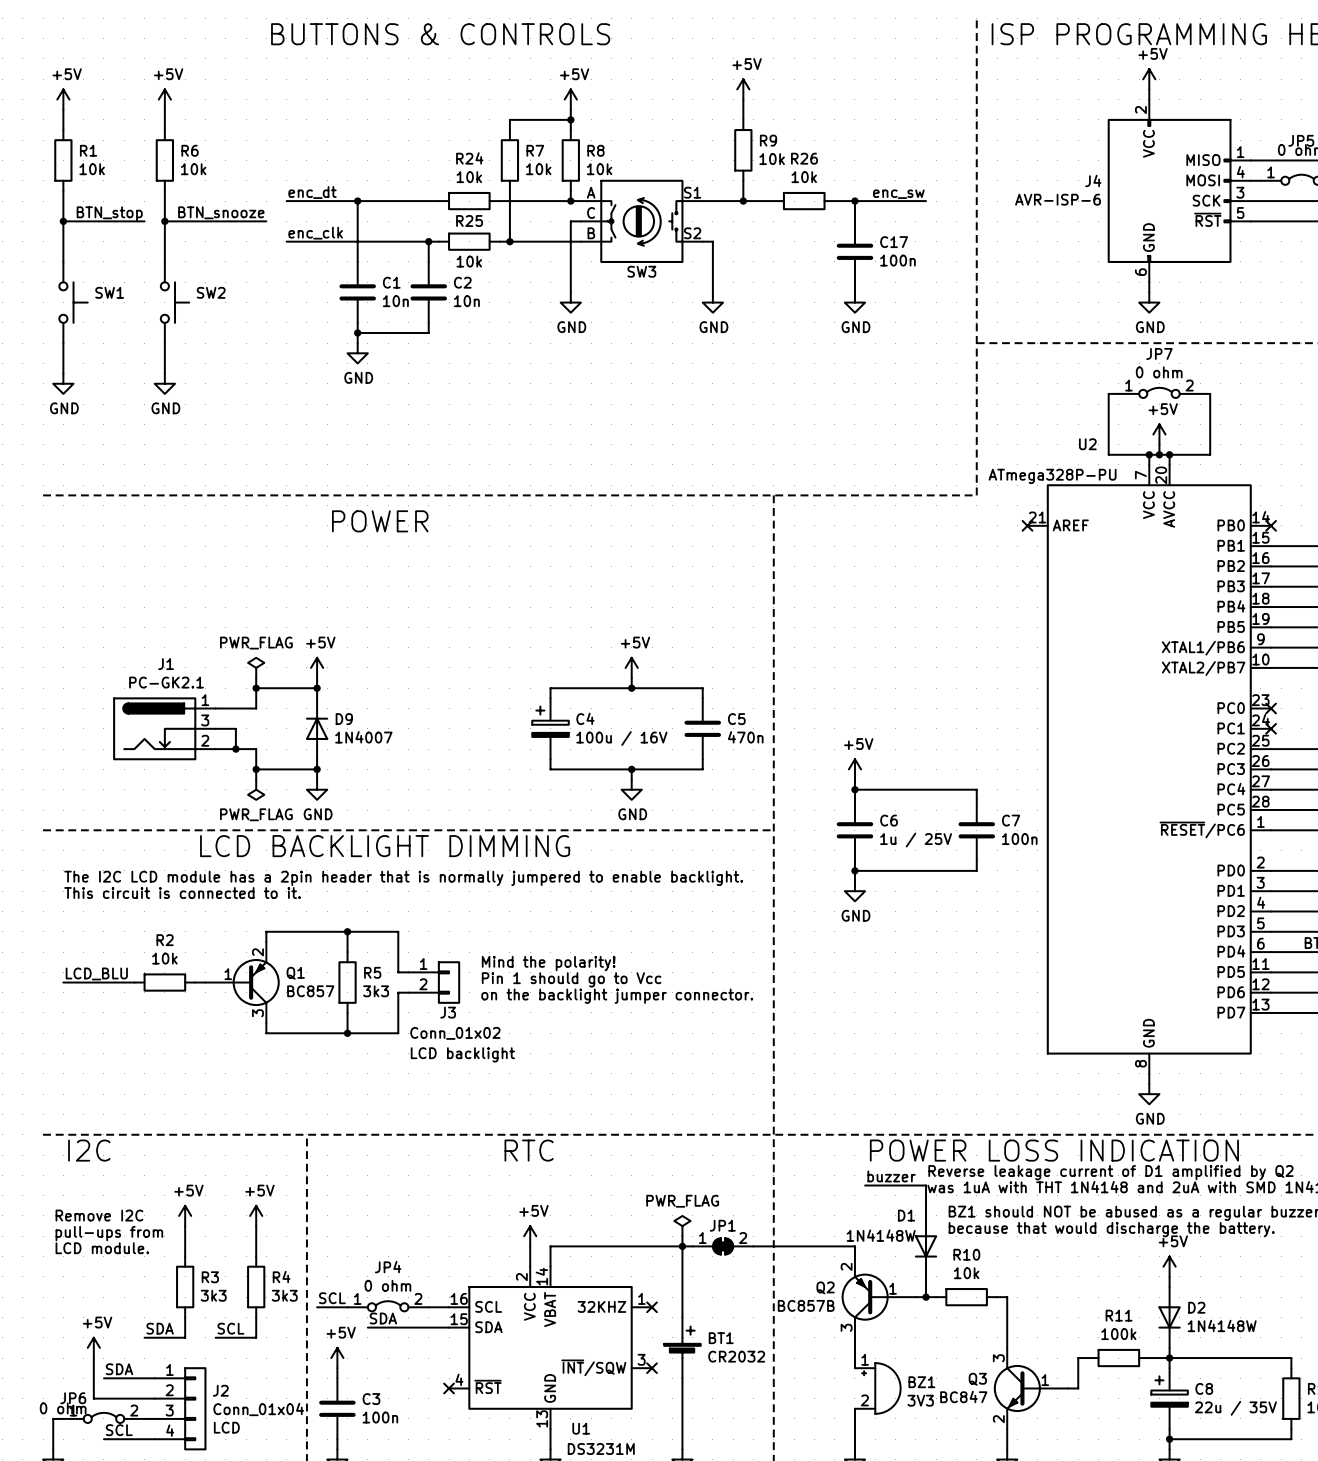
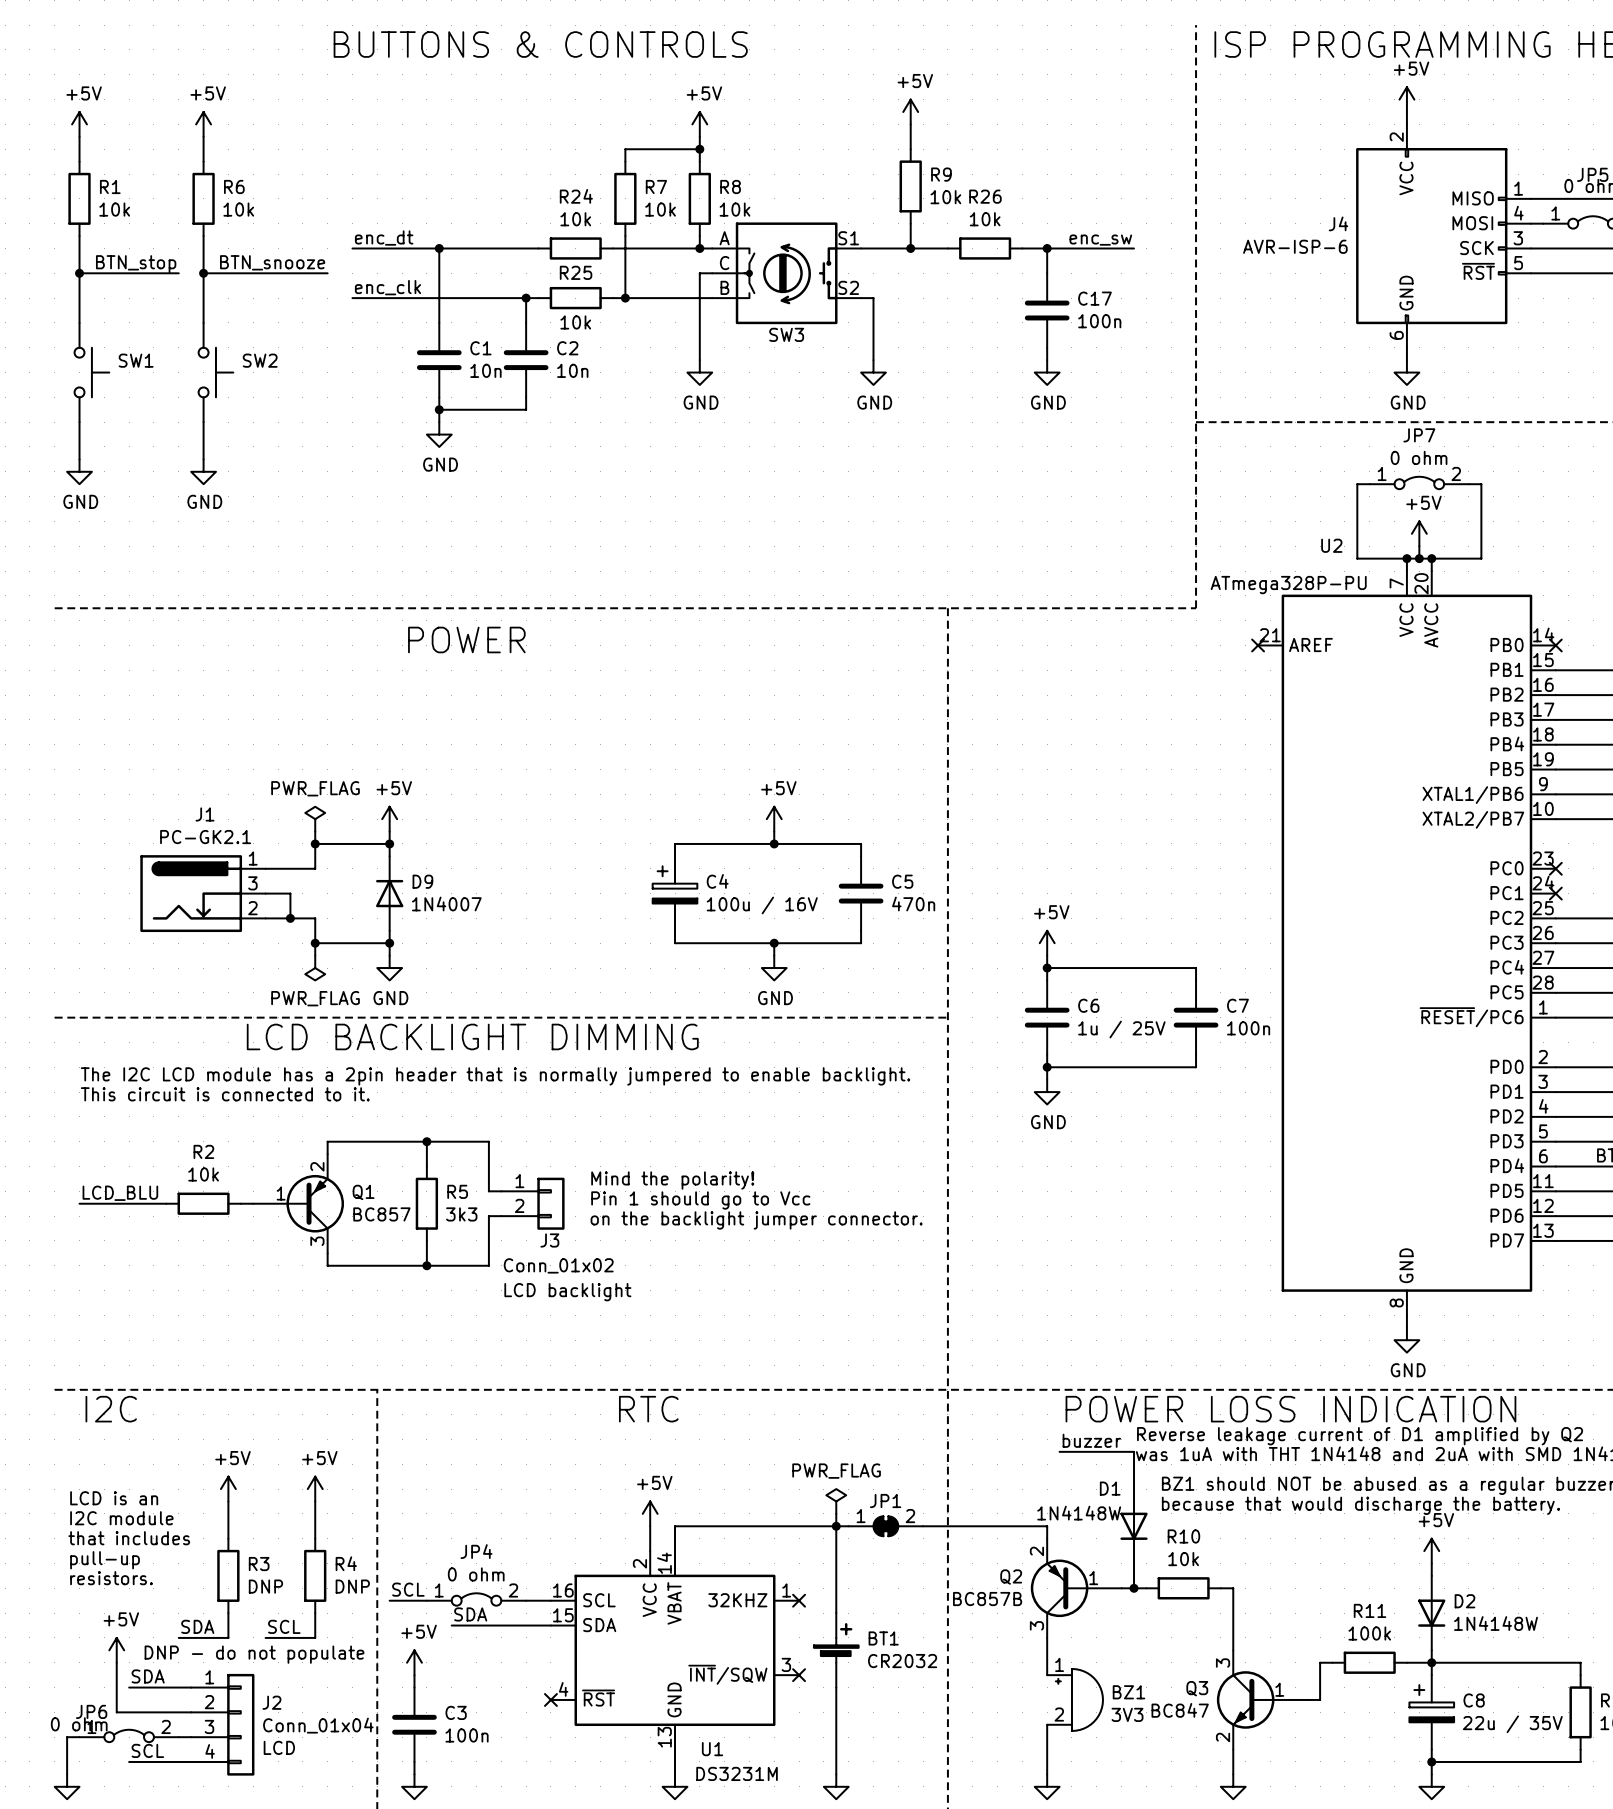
text: Remove I2C (99, 1215) -> none
text: none -> LCD is an (114, 1498)
text: pull-ups from (109, 1233) -> none
text: LCD module. (102, 1248) -> I2C module (121, 1518)
text: none -> that includes (129, 1538)
text: none -> pull-up (105, 1560)
text: none -> resistors. (111, 1578)
R3 value: 3k3 (213, 1295) -> DNP (265, 1586)
R4 value: 3k3 (284, 1295) -> DNP (352, 1586)
text: none -> DNP - do not populate (254, 1654)

